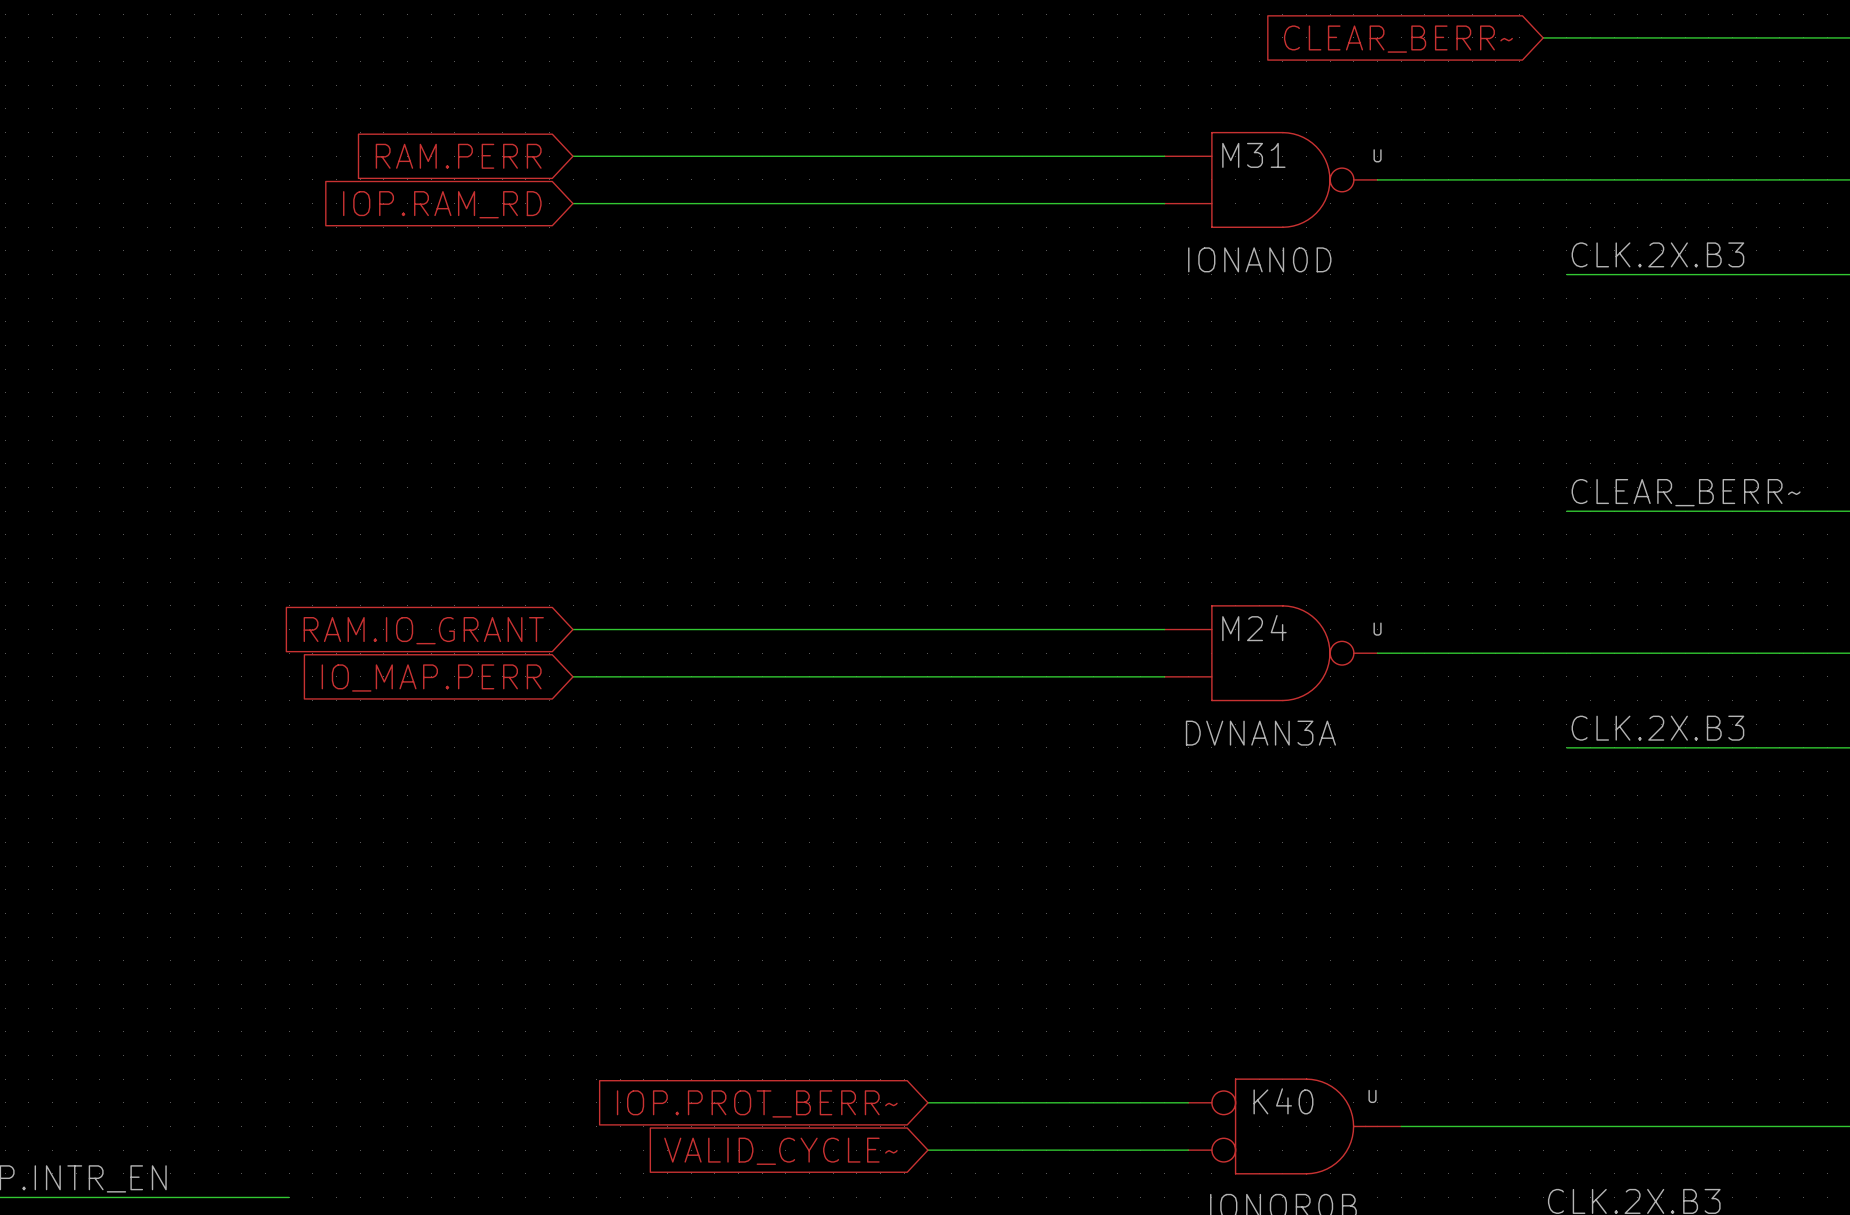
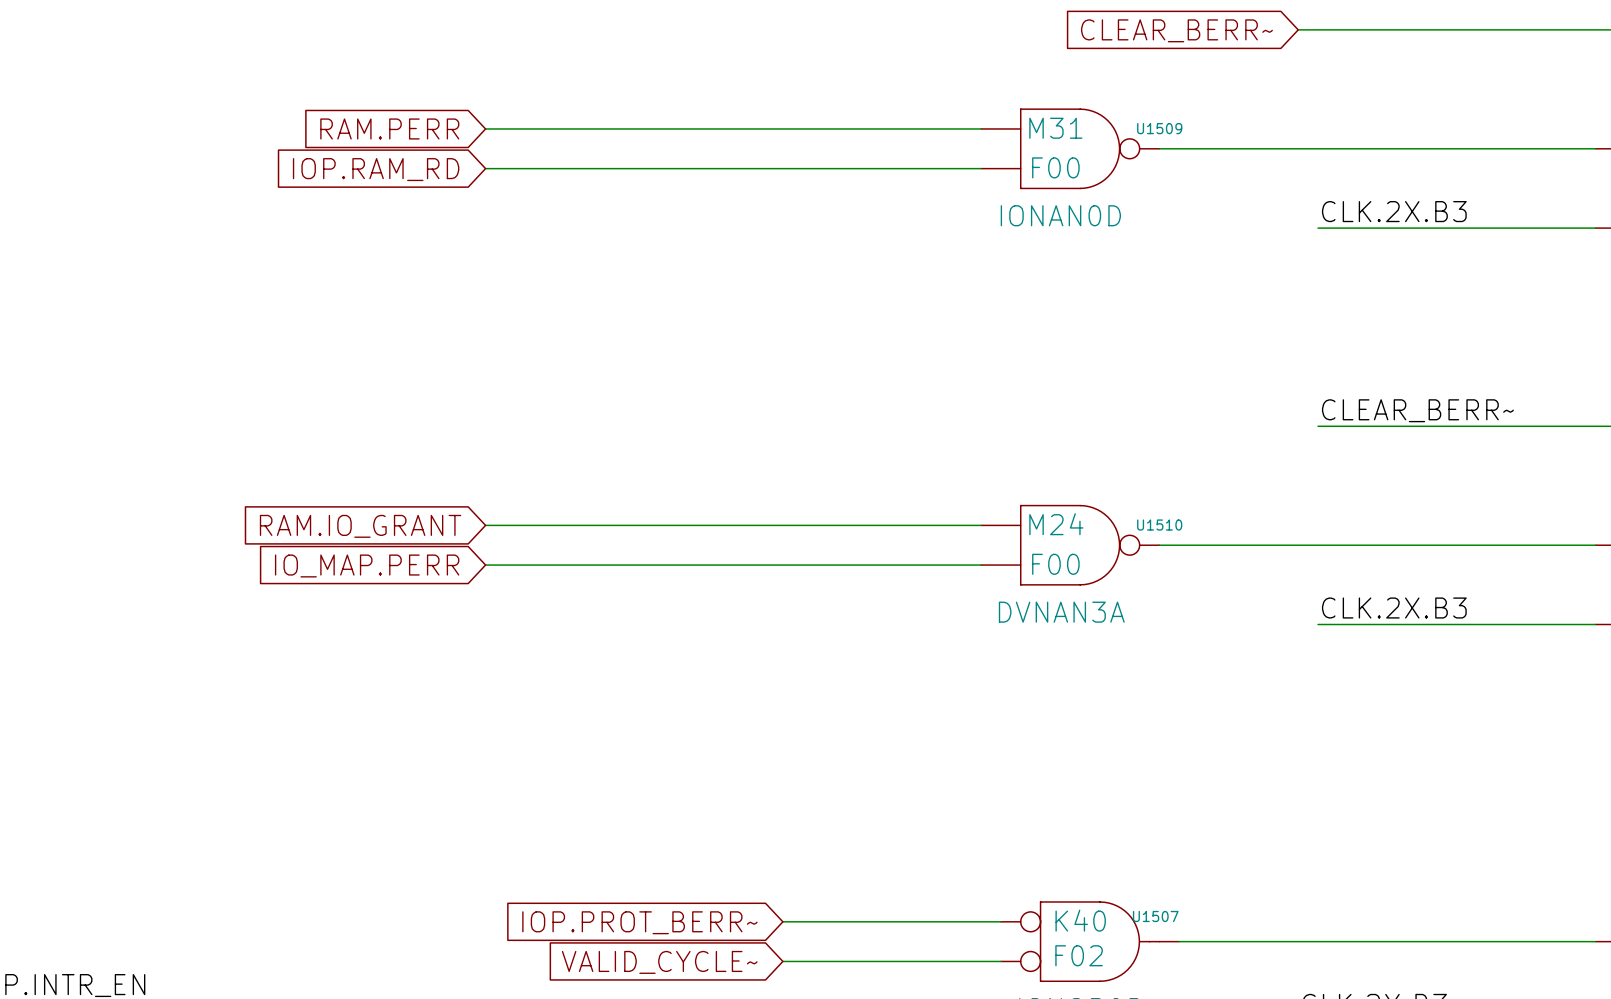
U name: U (1377, 155) -> U1509 (1159, 128)
U value: none -> F00 (1055, 167)
U name: U (1377, 629) -> U1510 (1159, 525)
U value: none -> F00 (1055, 564)
U name: U (1372, 1096) -> U1507 (1155, 916)
U value: none -> F02 (1079, 955)

